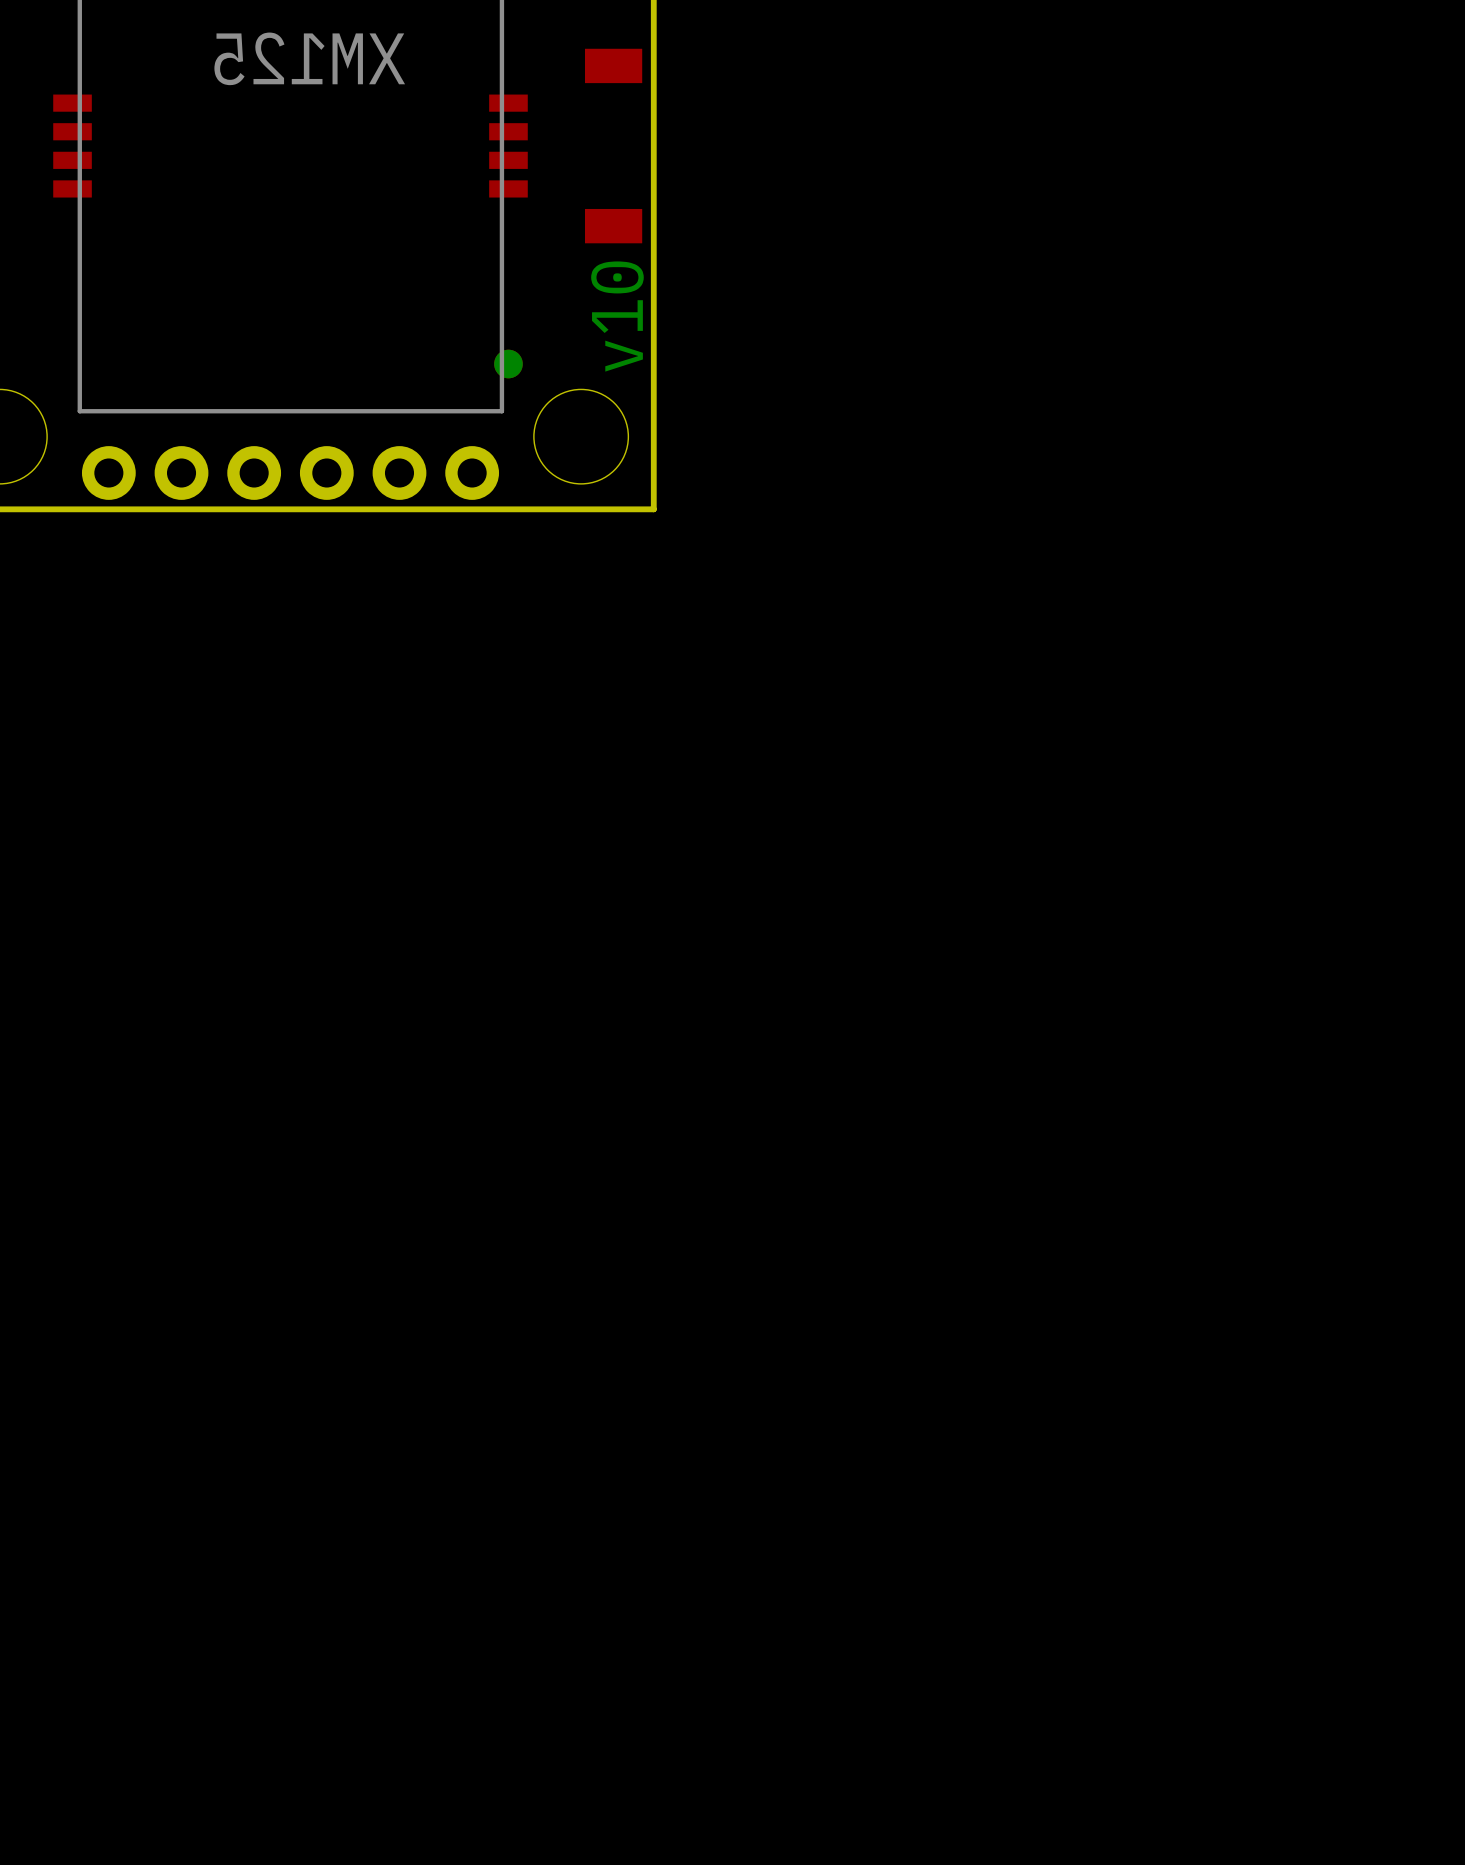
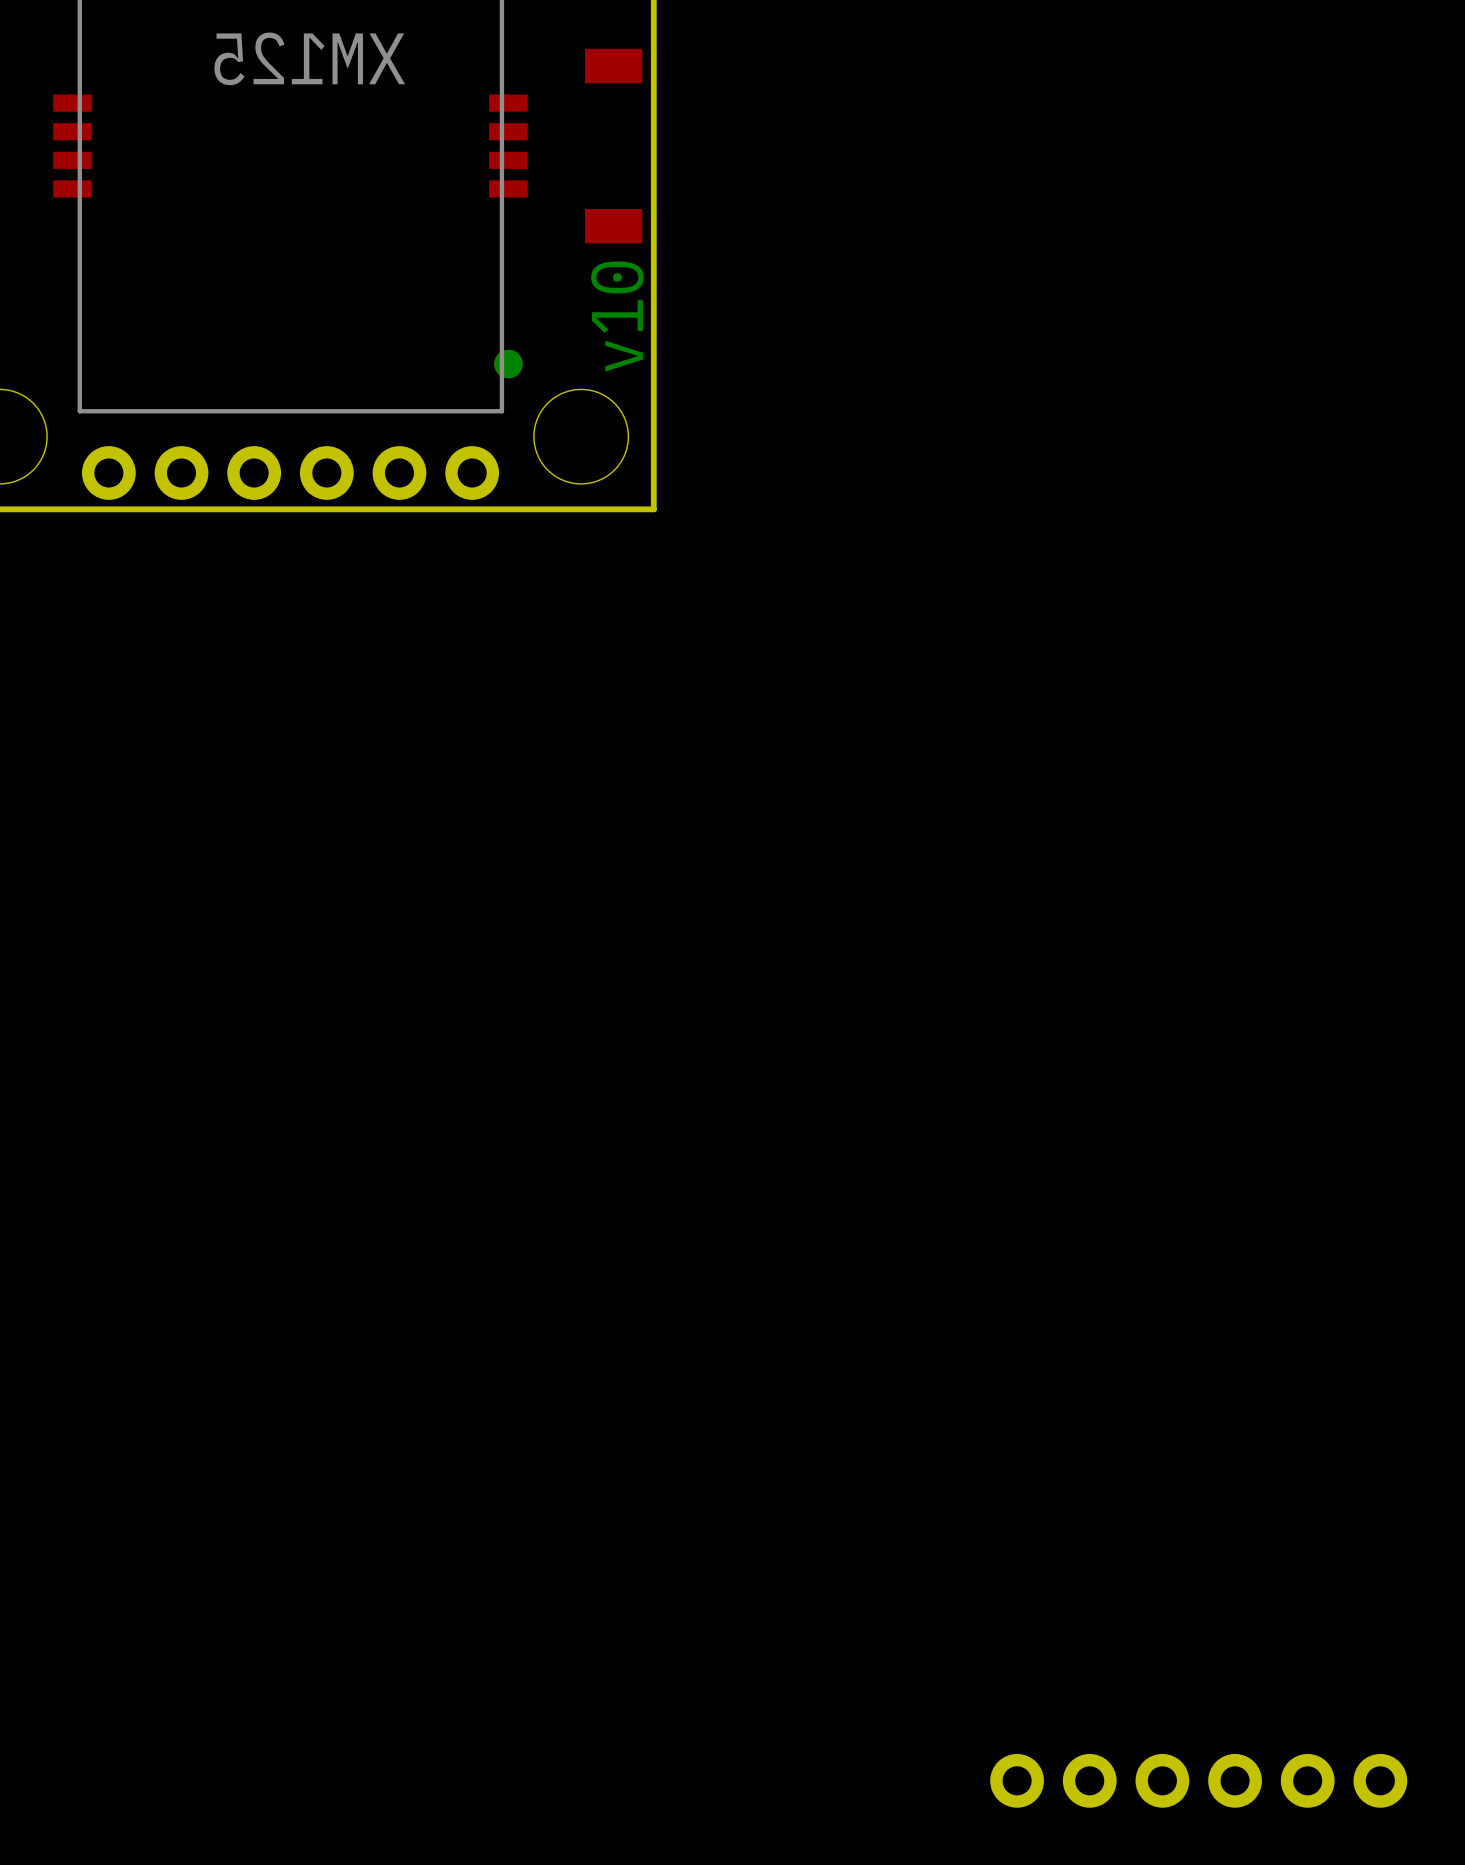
part: none -> (1198, 1780)

